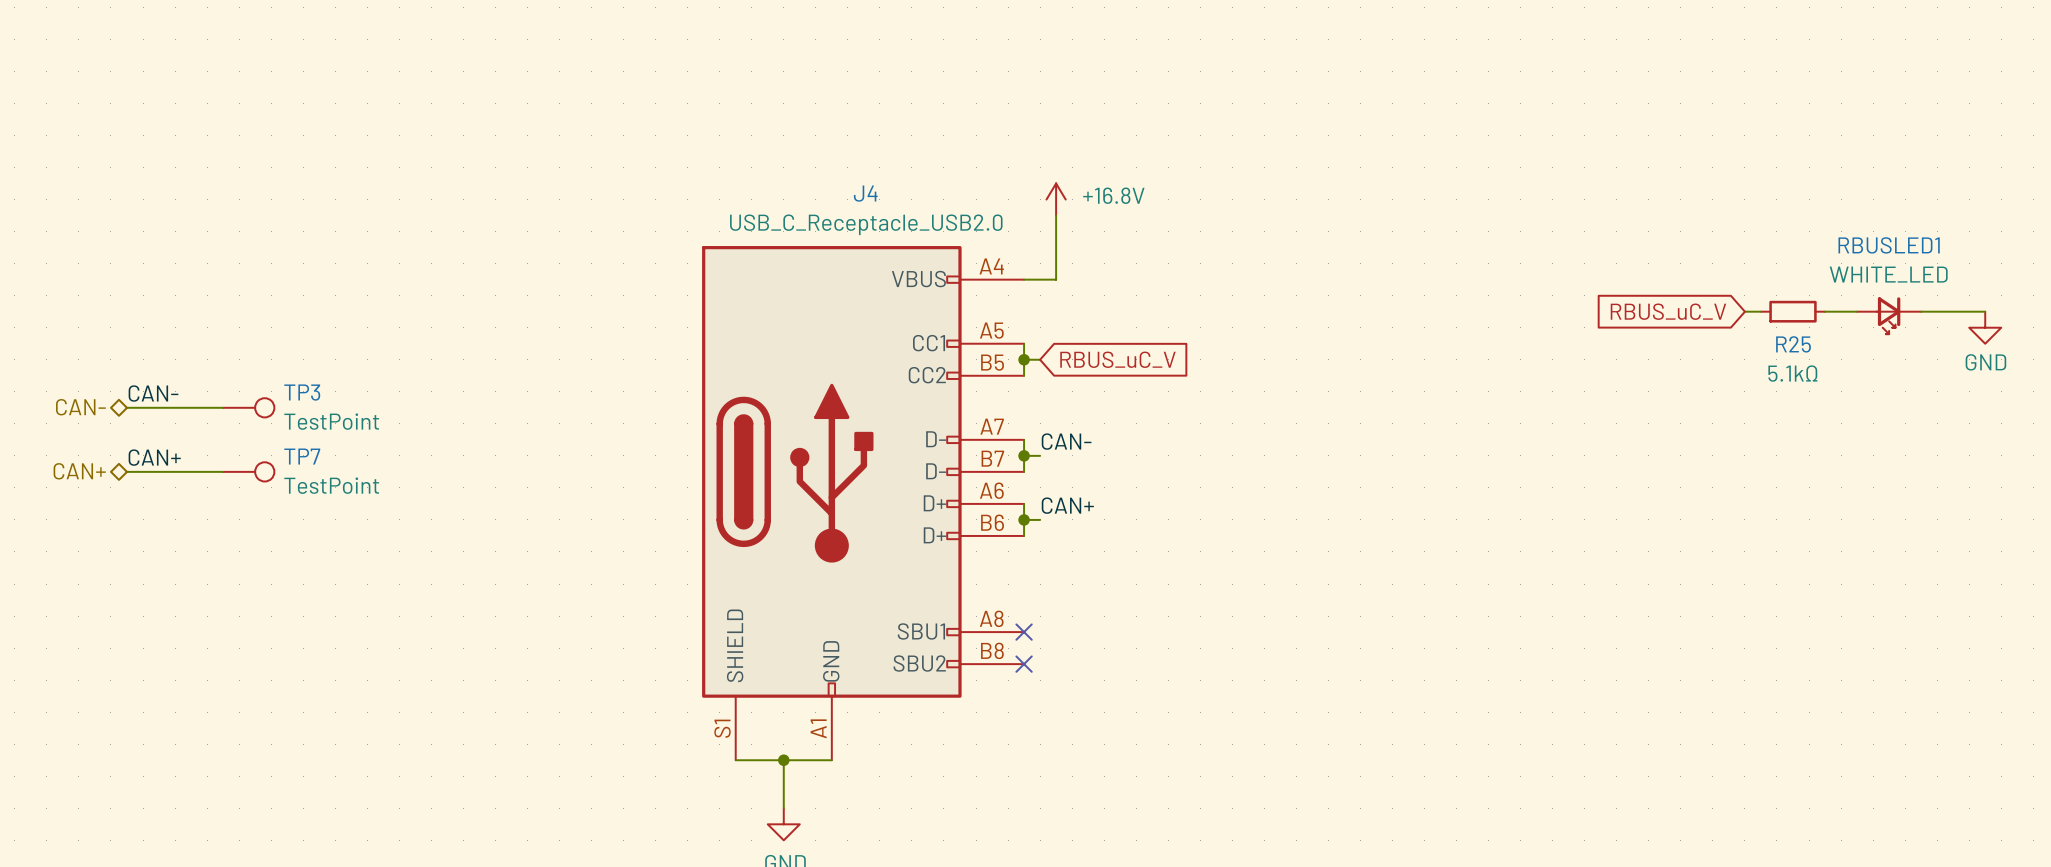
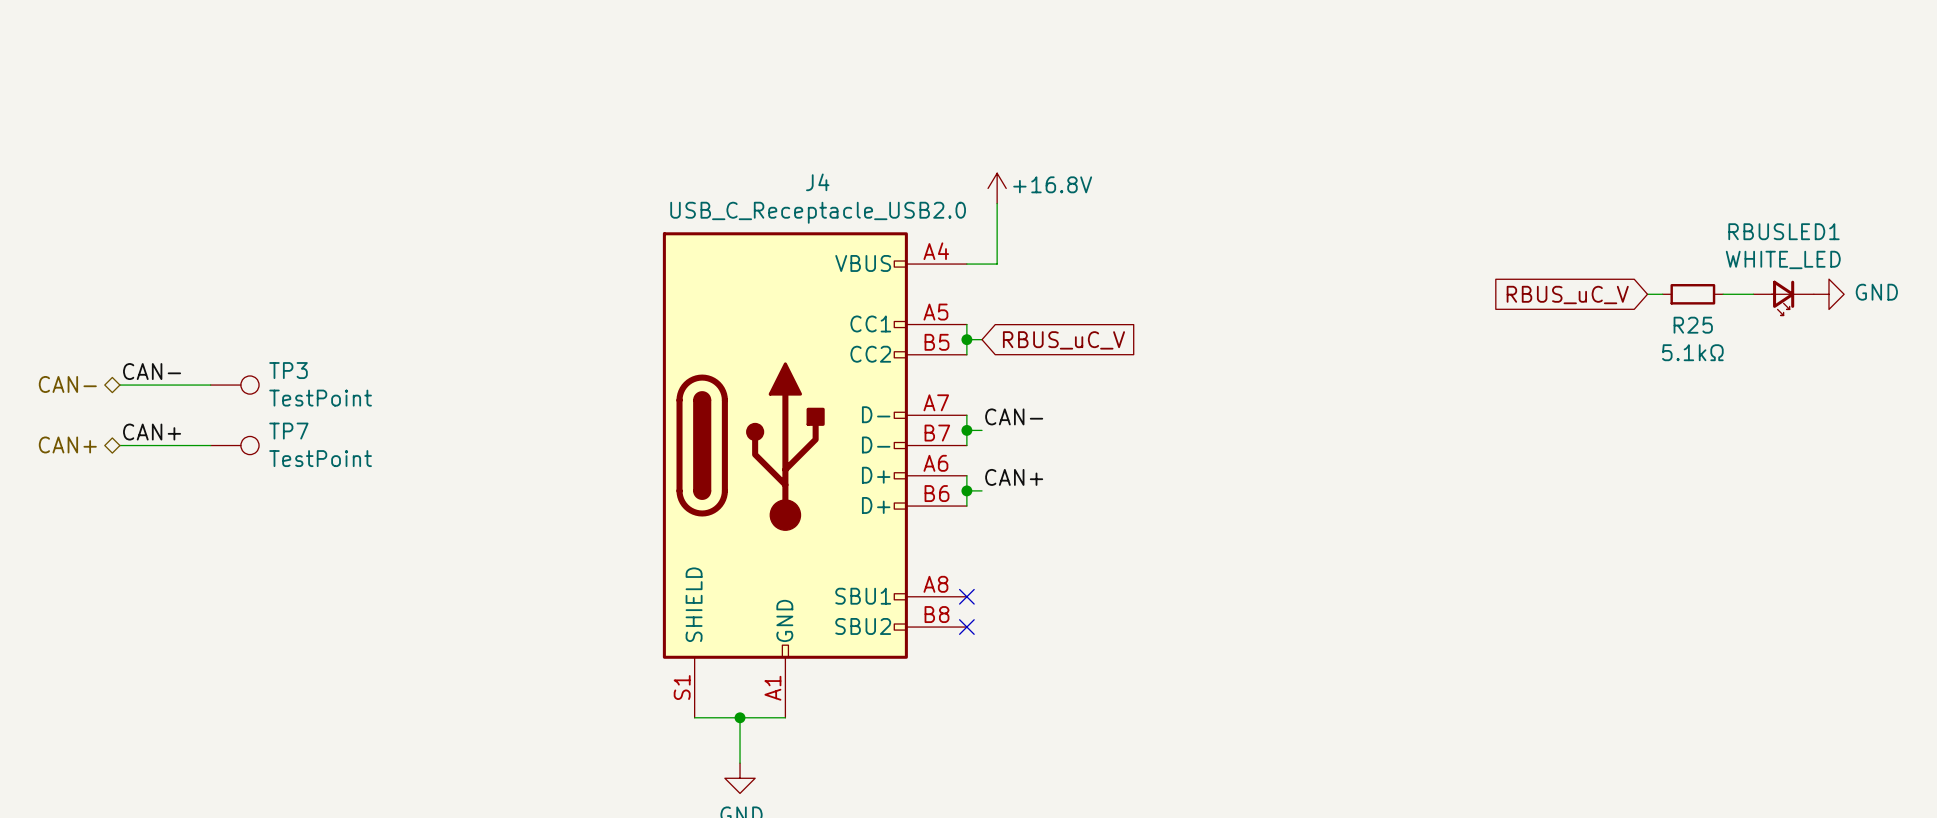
wire: (1921, 311) (1985, 311) -> none
power symbol rotation: 0° (1985, 327) -> 90° counterclockwise (1828, 294)
power symbol position: GND (1985, 327) -> GND (1828, 294)

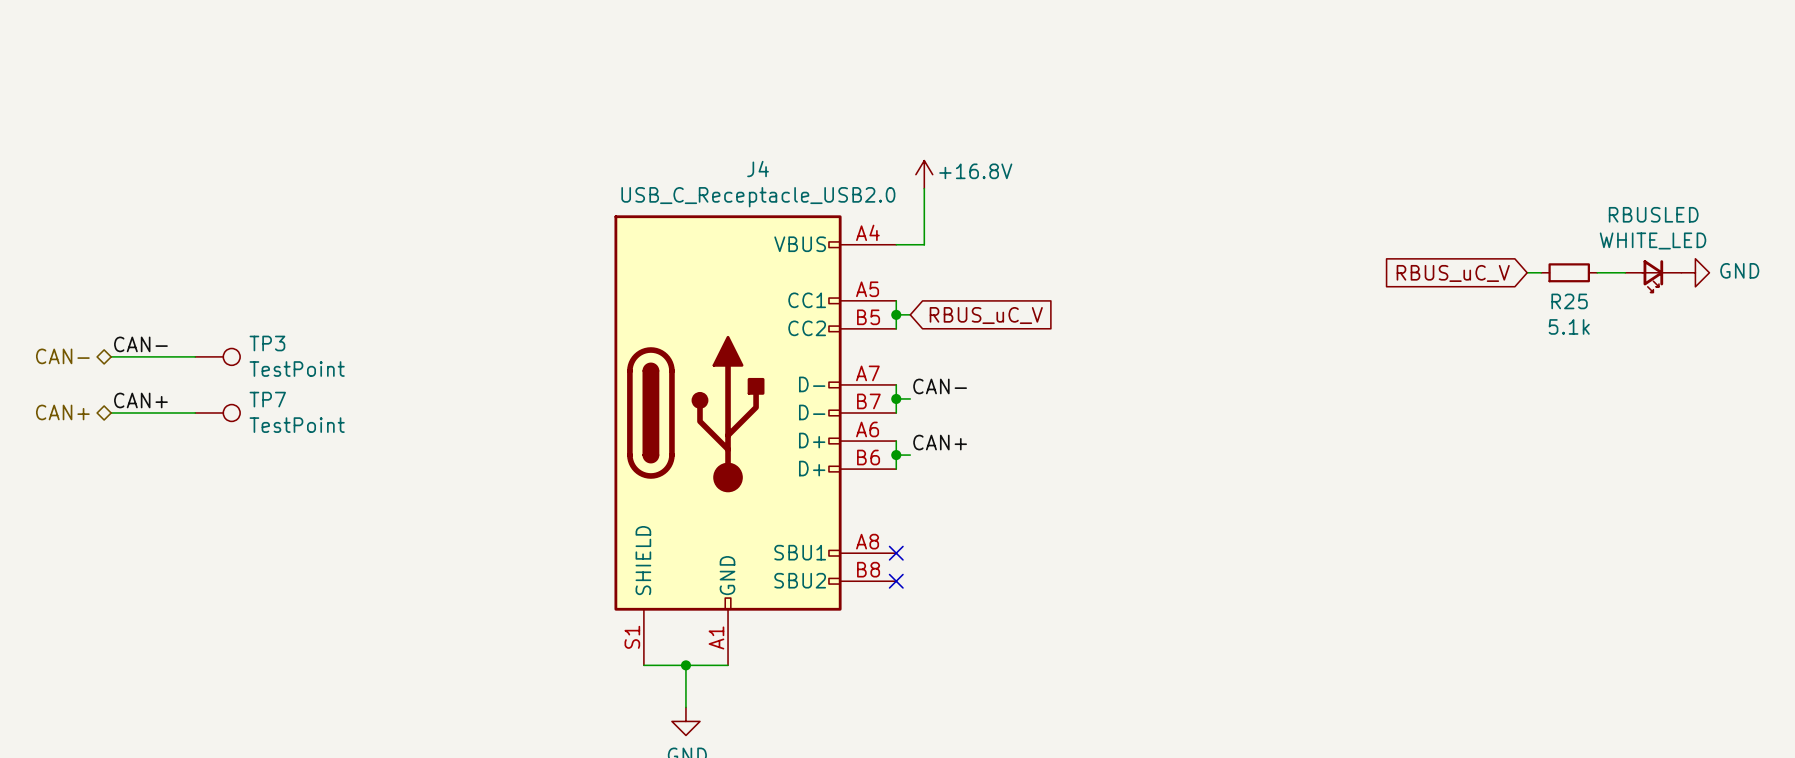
RBUSLED1 name: RBUSLED1 (1783, 231) -> RBUSLED (1653, 214)
R25 value: 5.1kΩ (1692, 352) -> 5.1k (1569, 326)

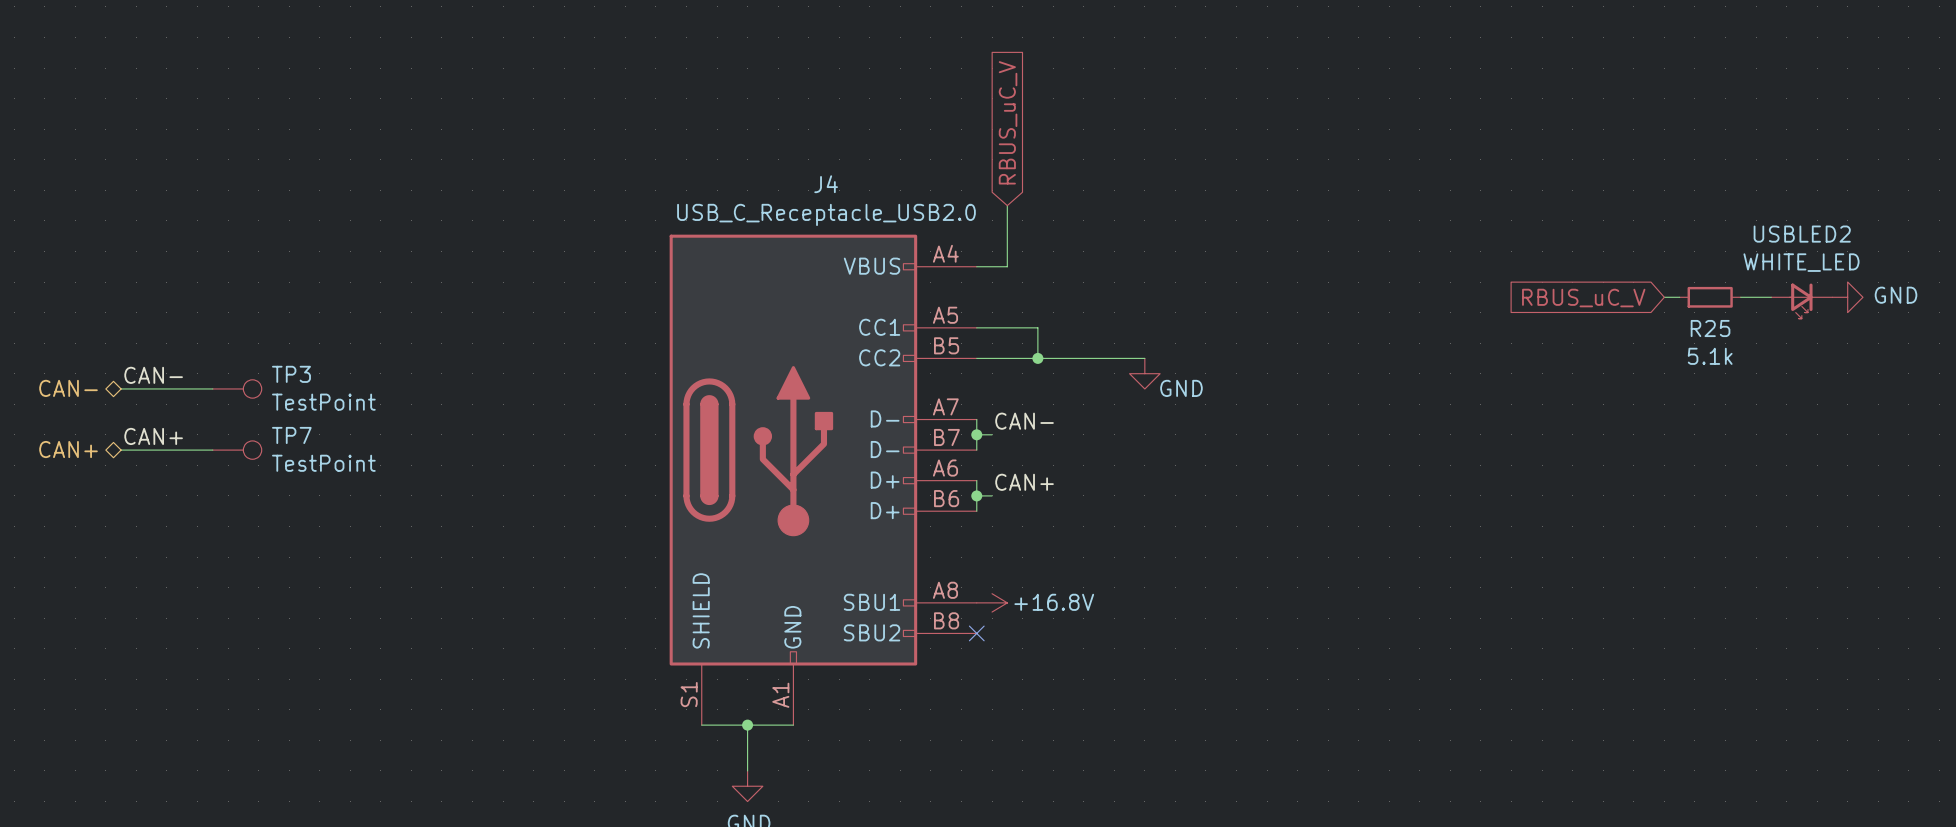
power symbol: +16.8V (924, 174) -> none
RBUSLED name: RBUSLED (1653, 214) -> USBLED2 (1802, 234)
wire: (896, 300) (896, 328) -> (976, 327) (1037, 327) (1037, 358)
wire: (896, 314) (910, 314) -> none
junction position: (896, 314) -> (1037, 358)
global label rotation: 0° (986, 315) -> 90° counterclockwise (1008, 122)
global label position: RBUS_uC_V (986, 315) -> RBUS_uC_V (1008, 122)
wire: none -> (976, 358) (1144, 358)
power symbol: none -> GND (1144, 373)
no-connect mark: (896, 553) -> none
power symbol: none -> +16.8V (992, 602)

